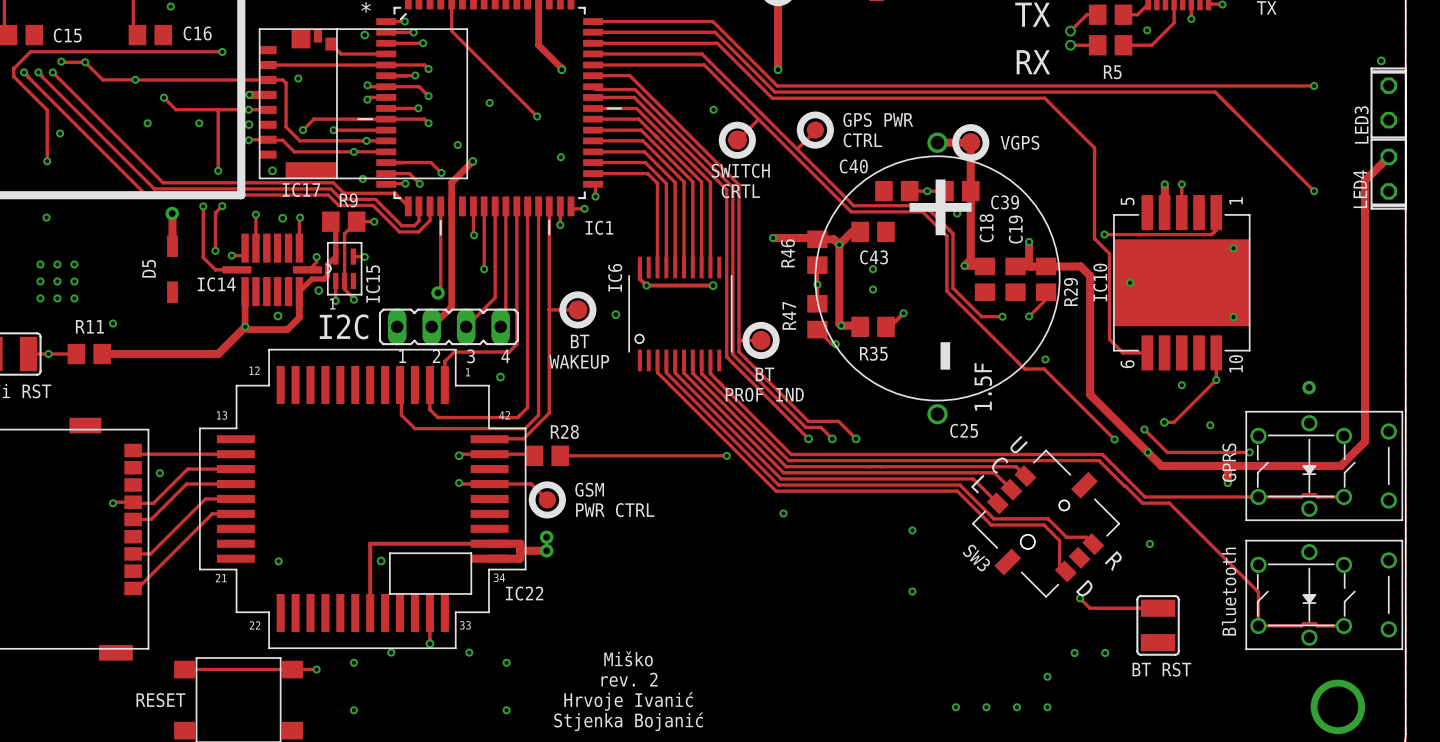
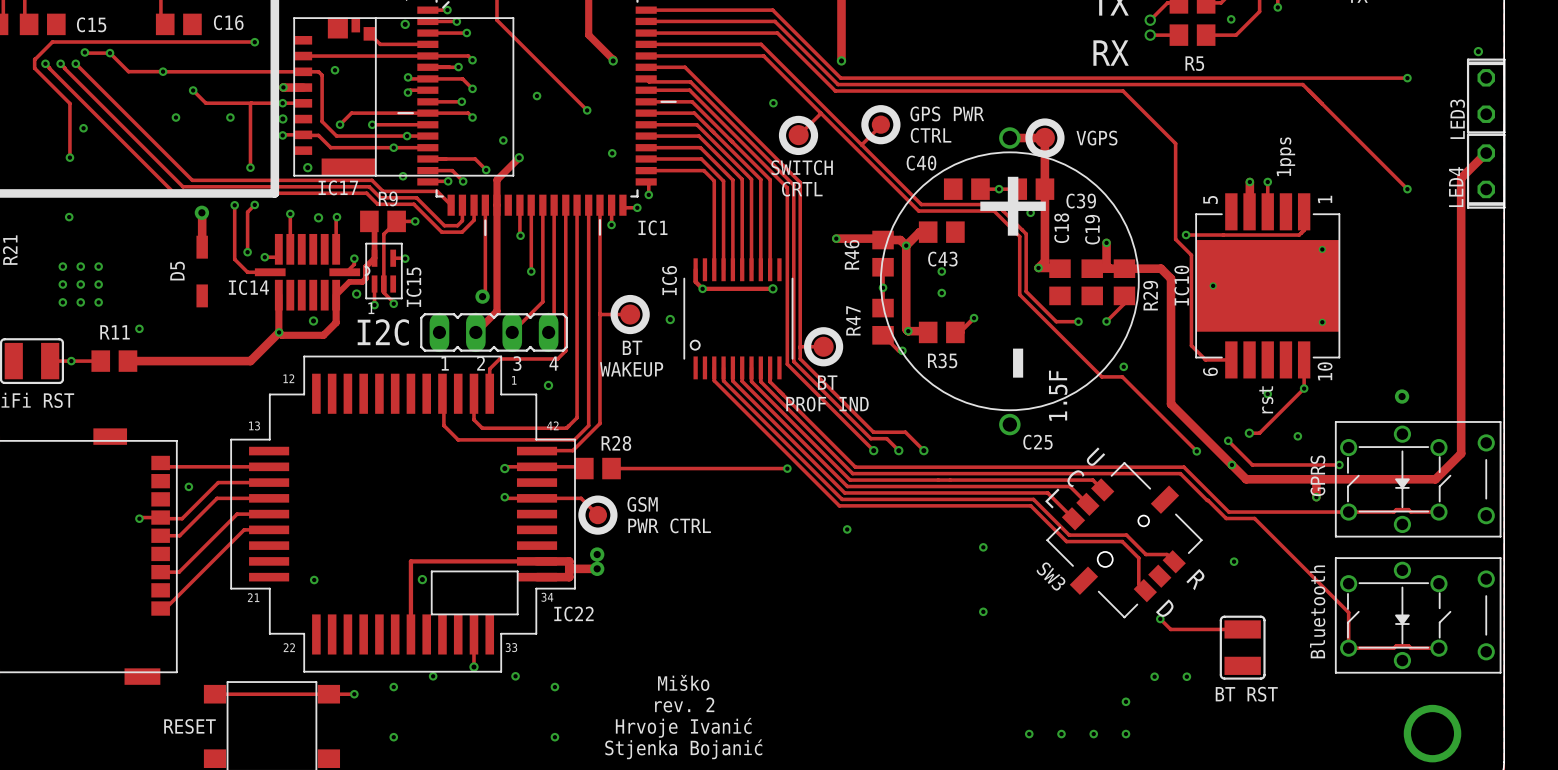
IC10 footprint: [1113, 195, 1251, 371] -> [1195, 193, 1341, 379]

